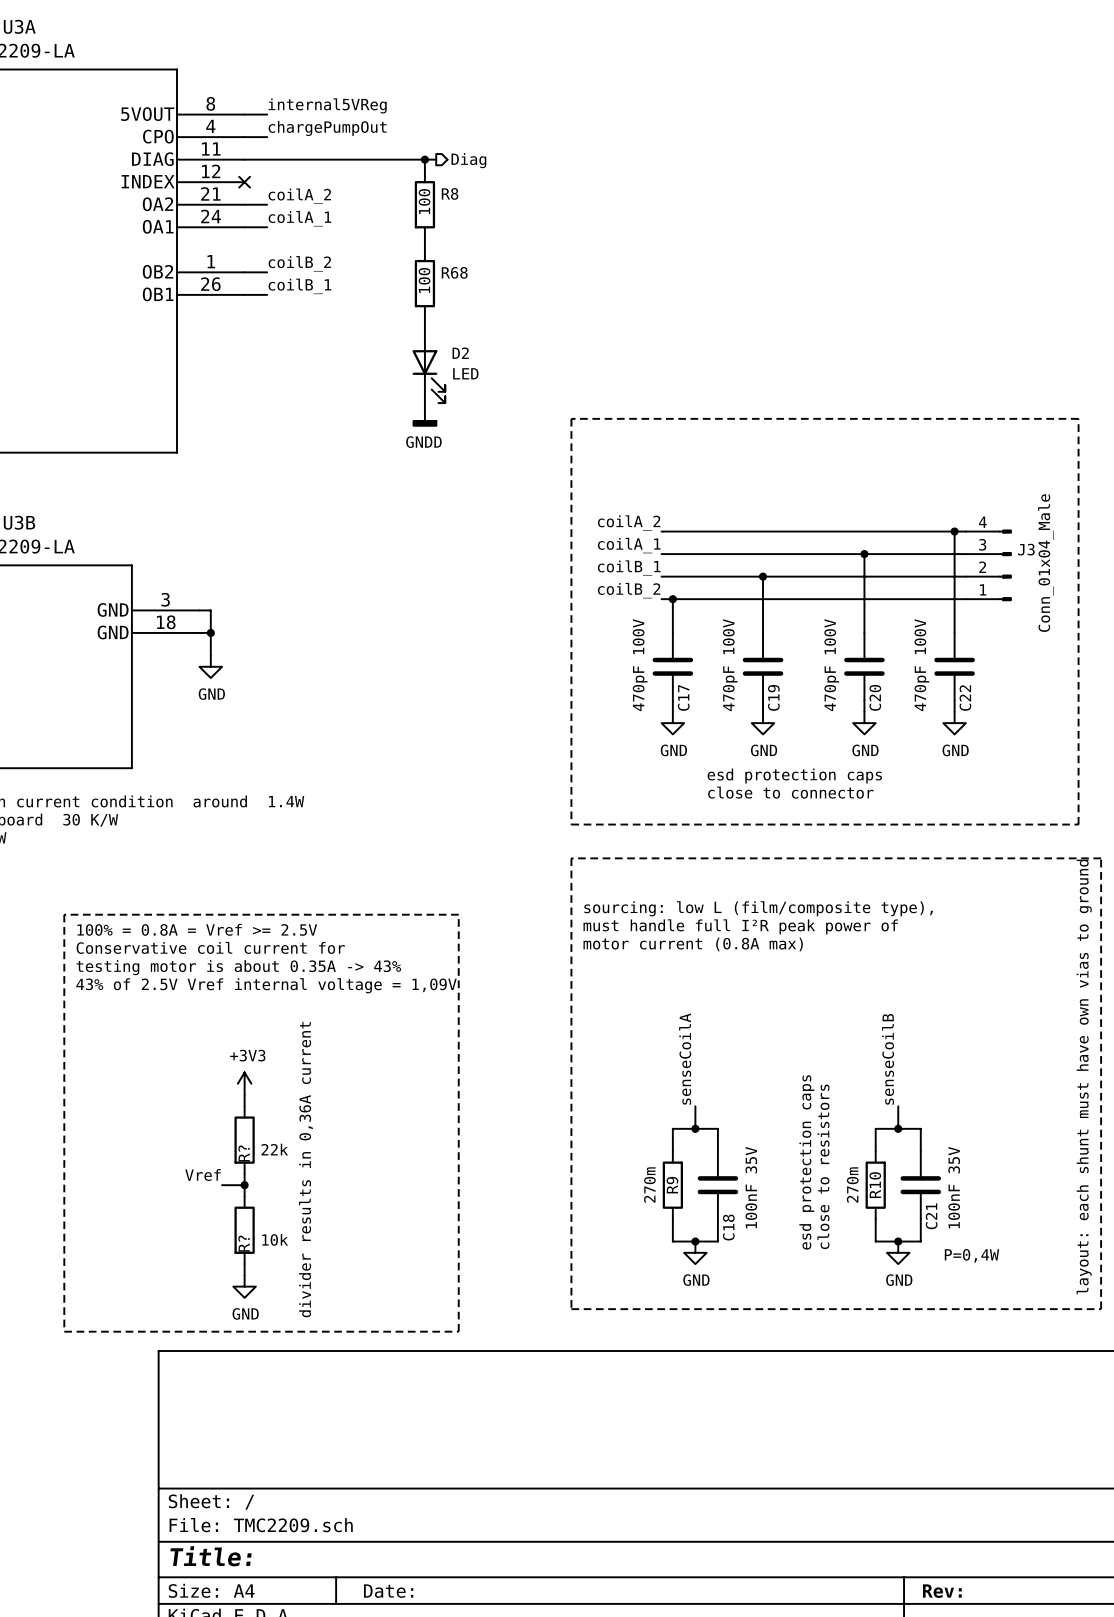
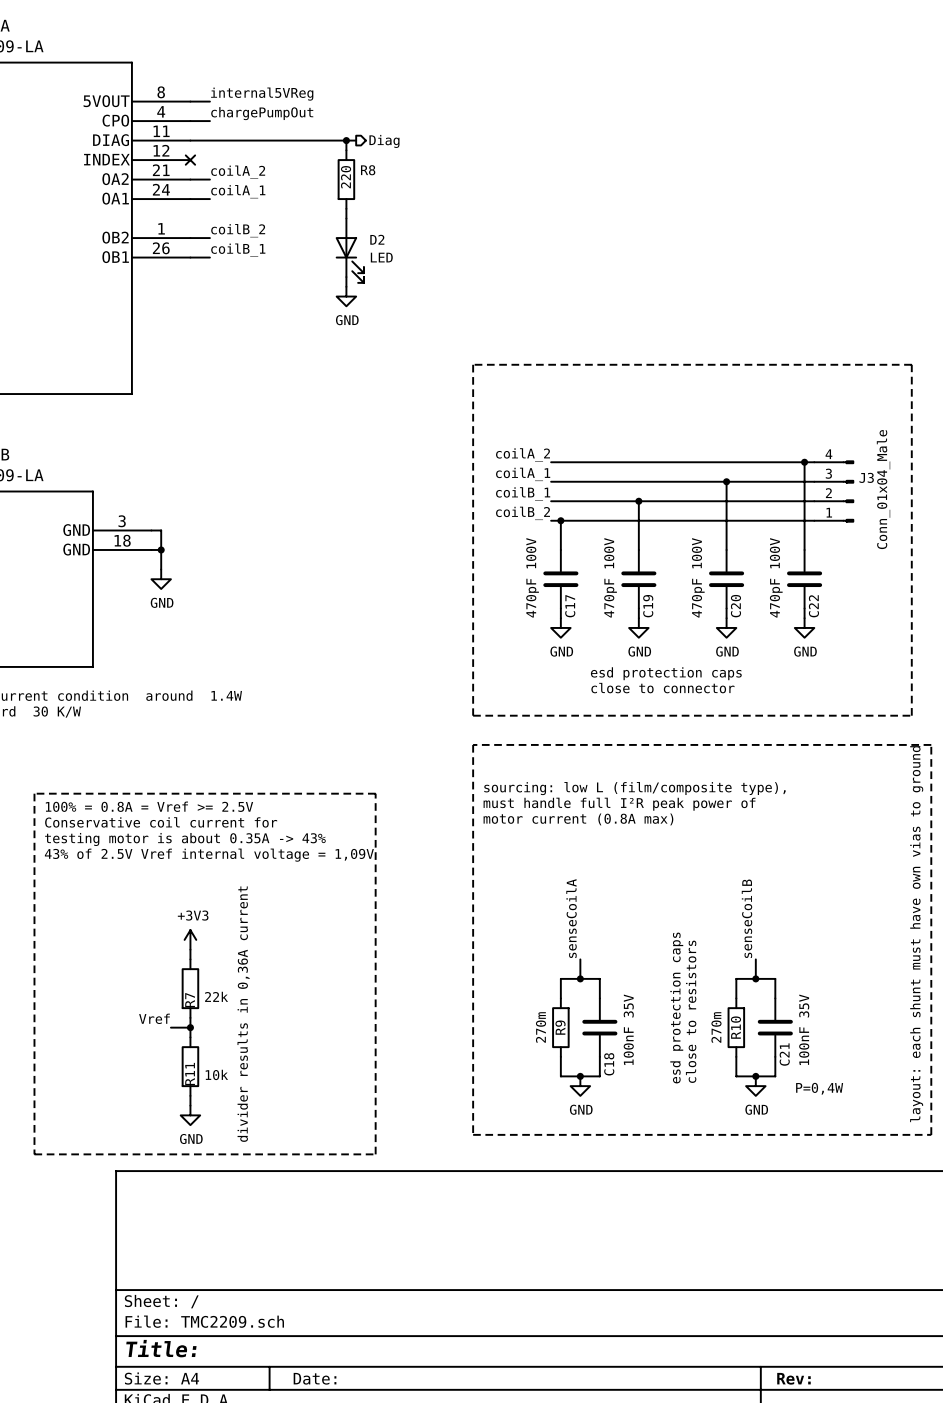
R8 value: 100 (424, 201) -> 220 (346, 177)
R68: 100 (424, 283) -> none
power symbol: none -> GND (346, 296)
D2 position: (428, 365) -> (349, 250)
wire: (424, 396) (424, 407) -> none
power symbol: GNDD (424, 417) -> none
R? name: R? (244, 1153) -> R7 (190, 1000)
R? name: R? (244, 1243) -> R11 (190, 1074)

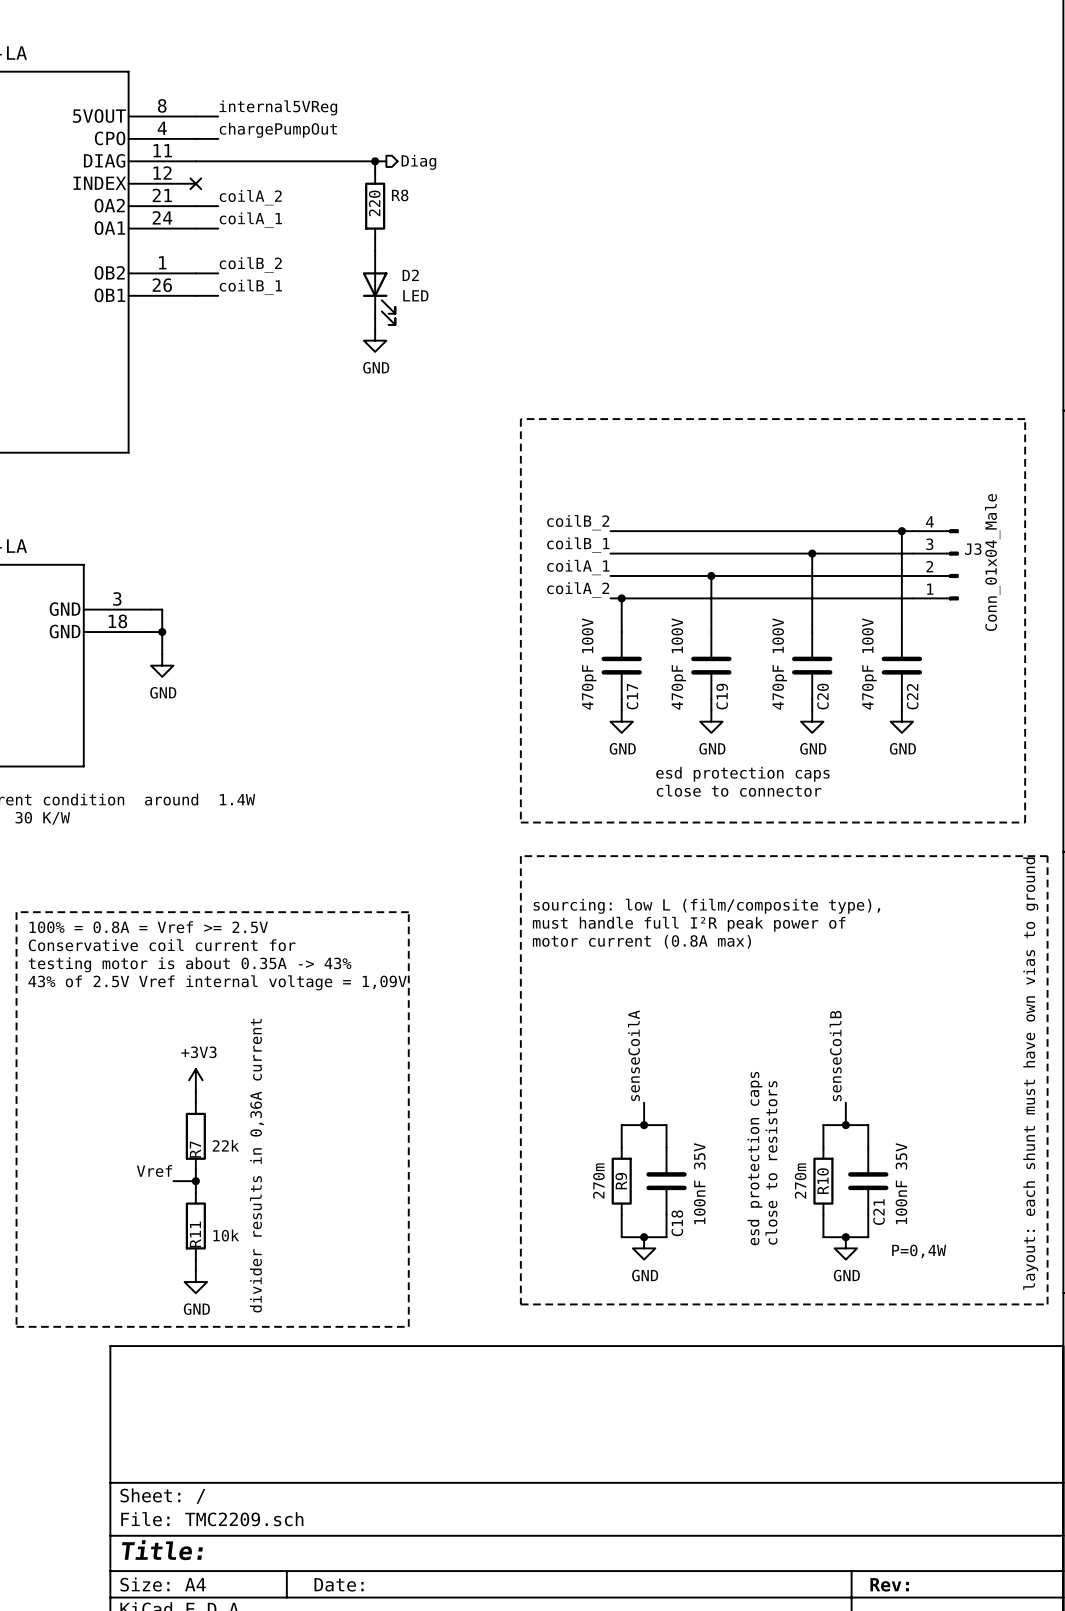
label: coilA_2 (523, 454) -> coilB_2 (578, 522)
label: coilA_1 (523, 474) -> coilB_1 (578, 545)
label: coilB_1 (523, 493) -> coilA_1 (578, 567)
label: coilB_2 (523, 513) -> coilA_2 (578, 589)

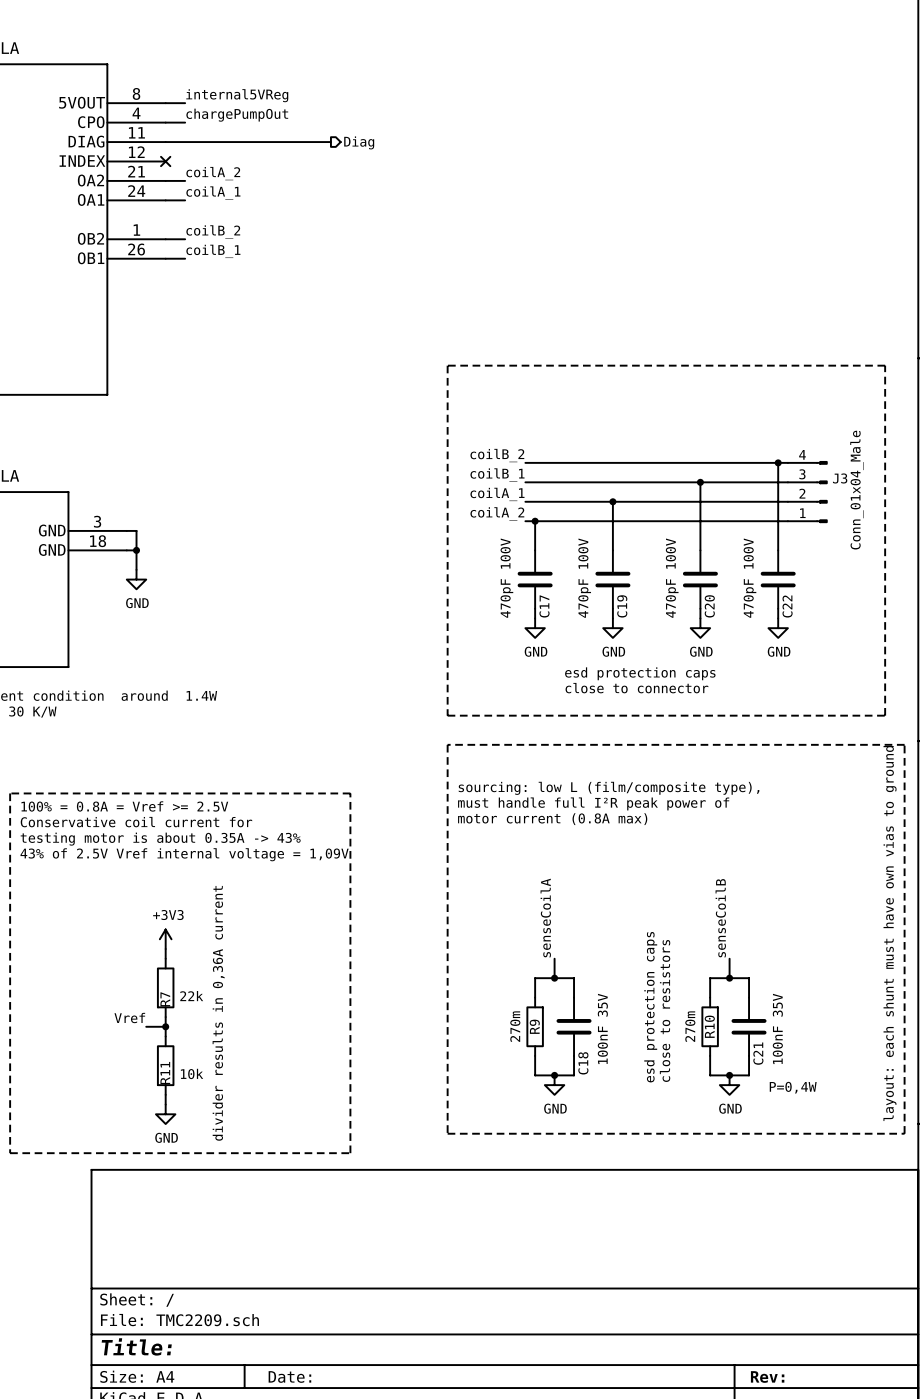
wire: (375, 161) (375, 172) -> none
junction: (375, 161) -> none
R8: 220 (375, 206) -> none
wire: (375, 239) (375, 250) -> none
D2: LED (379, 287) -> none
wire: (375, 318) (375, 329) -> none
power symbol: GND (375, 340) -> none

